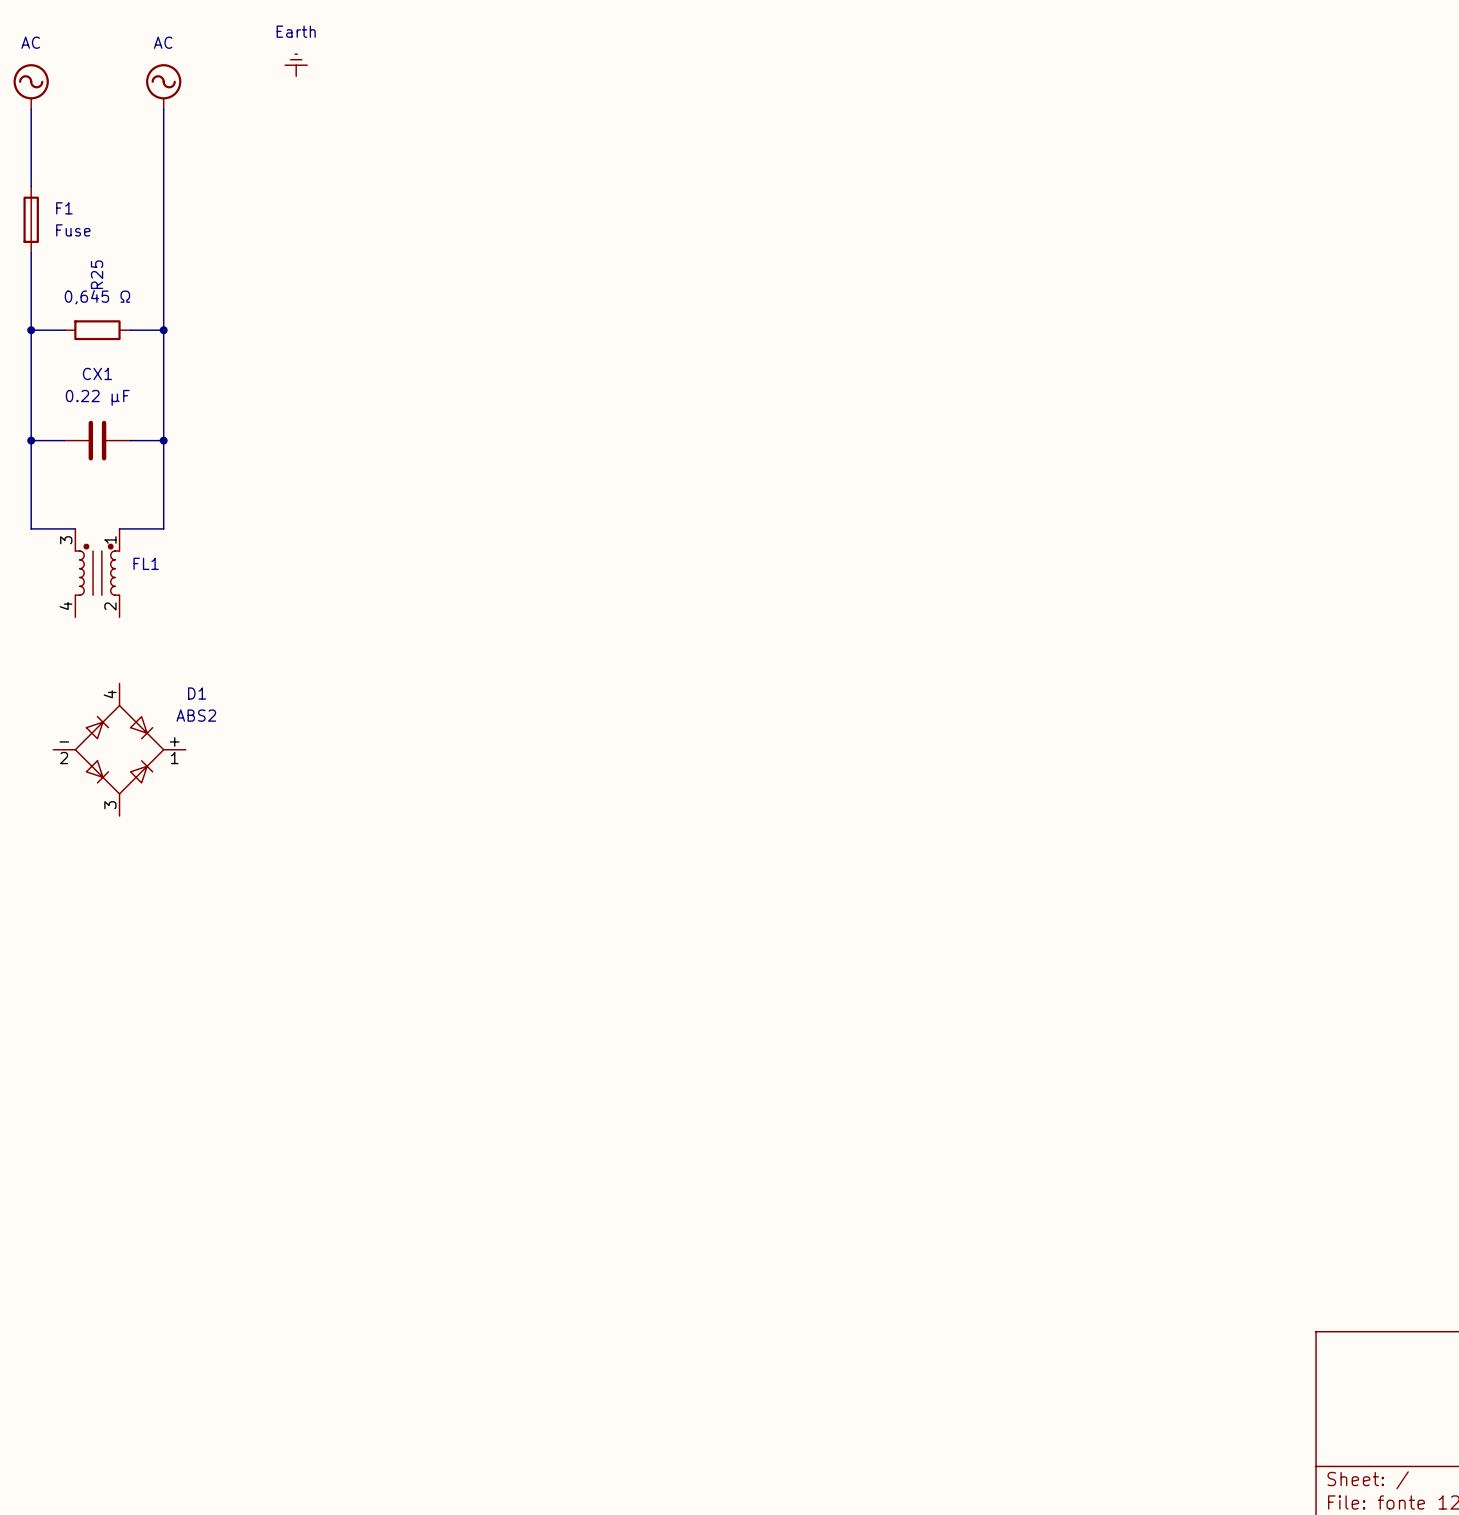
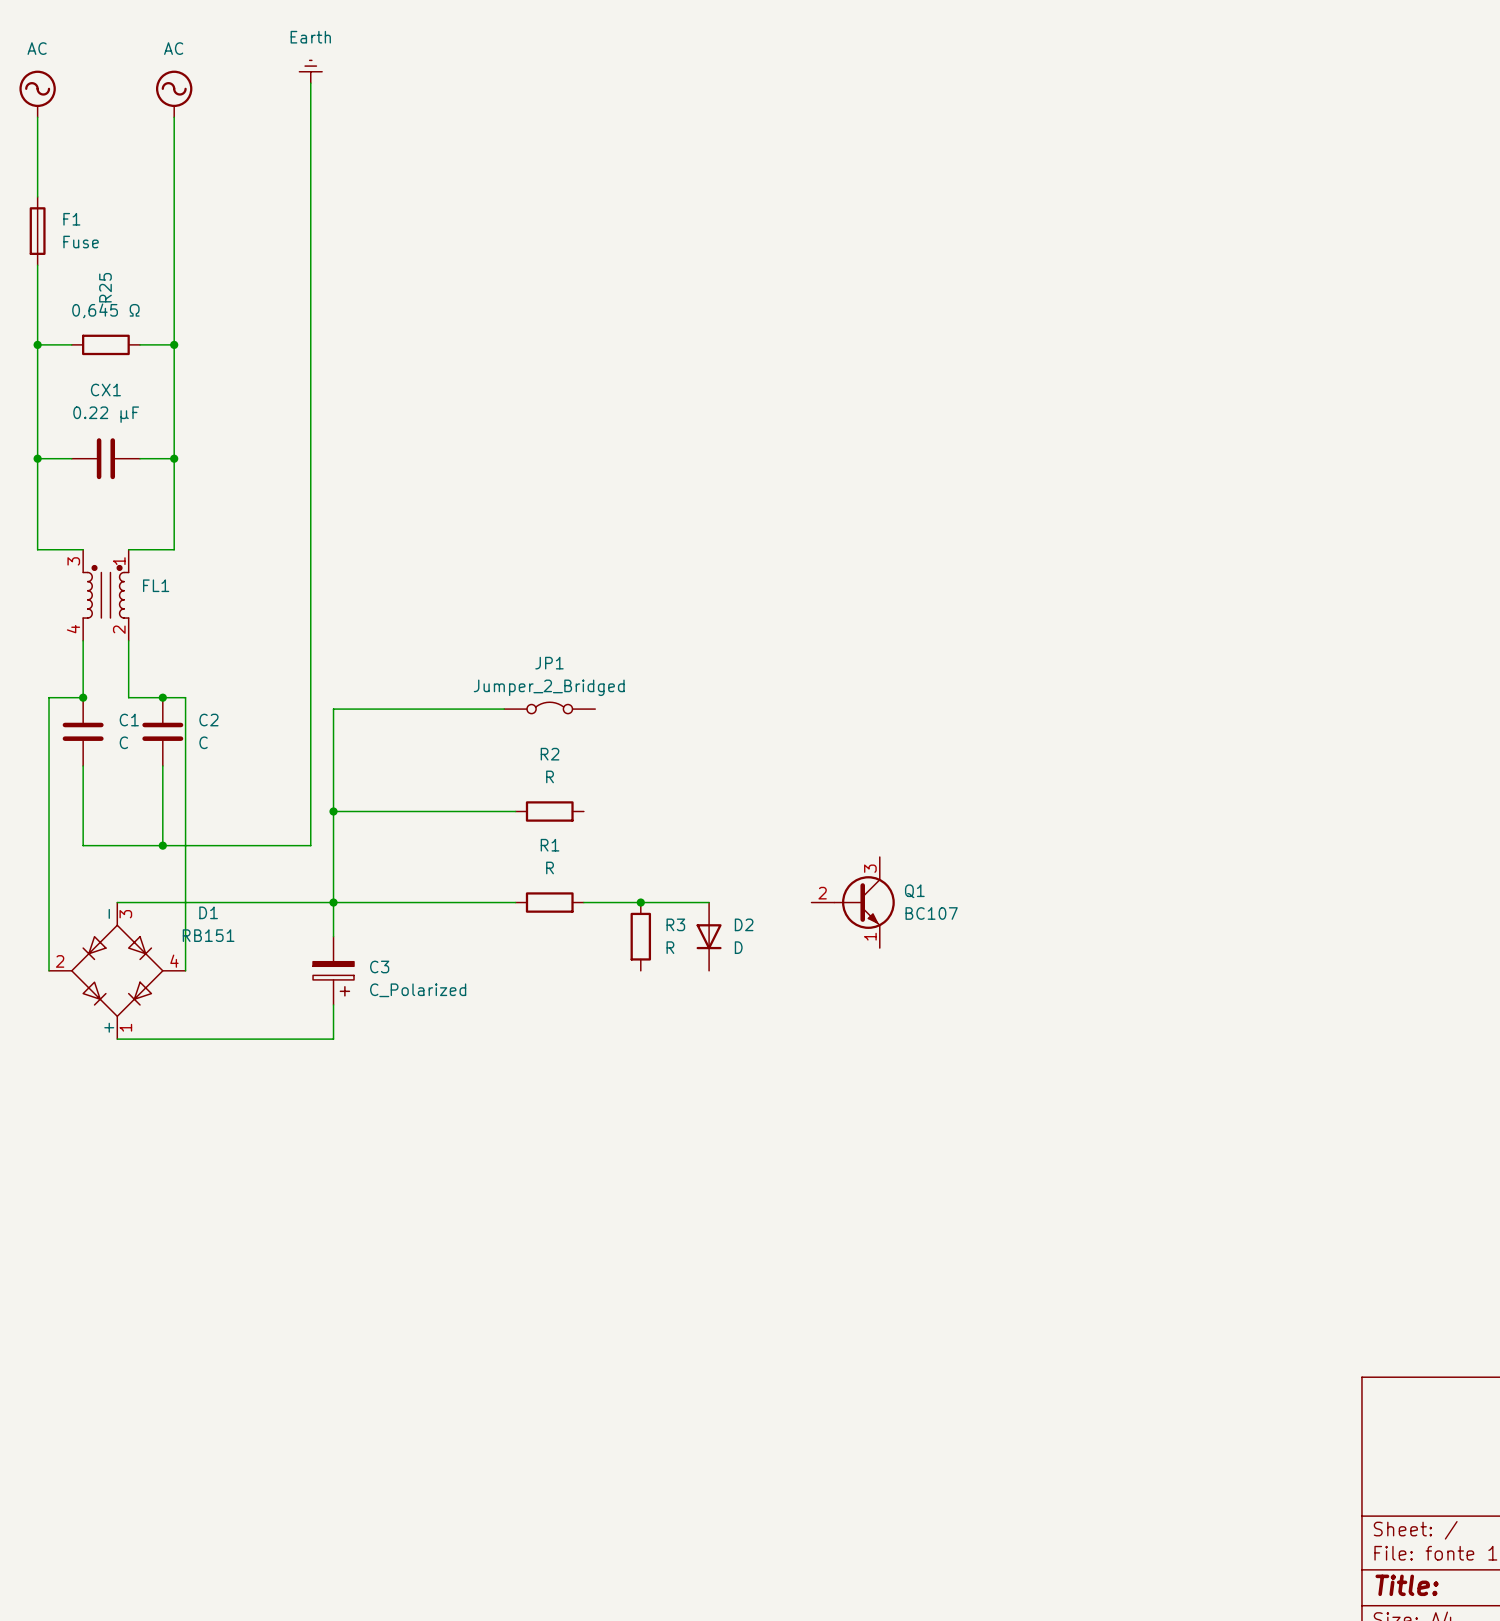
wire: none -> (310, 83) (310, 845) (83, 845) (83, 765)
wire: none -> (83, 640) (83, 697) (49, 697) (49, 970)
wire: none -> (128, 640) (128, 697) (185, 697) (185, 970)
junction: none -> (83, 697)
junction: none -> (162, 697)
JP1: none -> Jumper_2_Bridged (549, 707)
D1 symbol: [53, 683, 186, 816] -> [49, 902, 186, 1040]
wire: none -> (504, 709) (333, 709) (333, 936)
C1: none -> C (83, 731)
C2: none -> C (162, 731)
D1 value: ABS2 (196, 715) -> RB151 (208, 935)
wire: none -> (162, 765) (162, 845)
wire: none -> (333, 811) (515, 811)
junction: none -> (333, 811)
R2: none -> R (549, 811)
junction: none -> (162, 845)
wire: none -> (117, 902) (515, 902)
junction: none -> (333, 902)
R1: none -> R (549, 902)
wire: none -> (583, 902) (709, 902)
junction: none -> (640, 902)
Q1: none -> BC107 (853, 902)
R3: none -> R (640, 936)
D2: none -> D (709, 936)
C3: none -> C_Polarized (333, 970)
wire: none -> (333, 1004) (333, 1039) (117, 1039)

